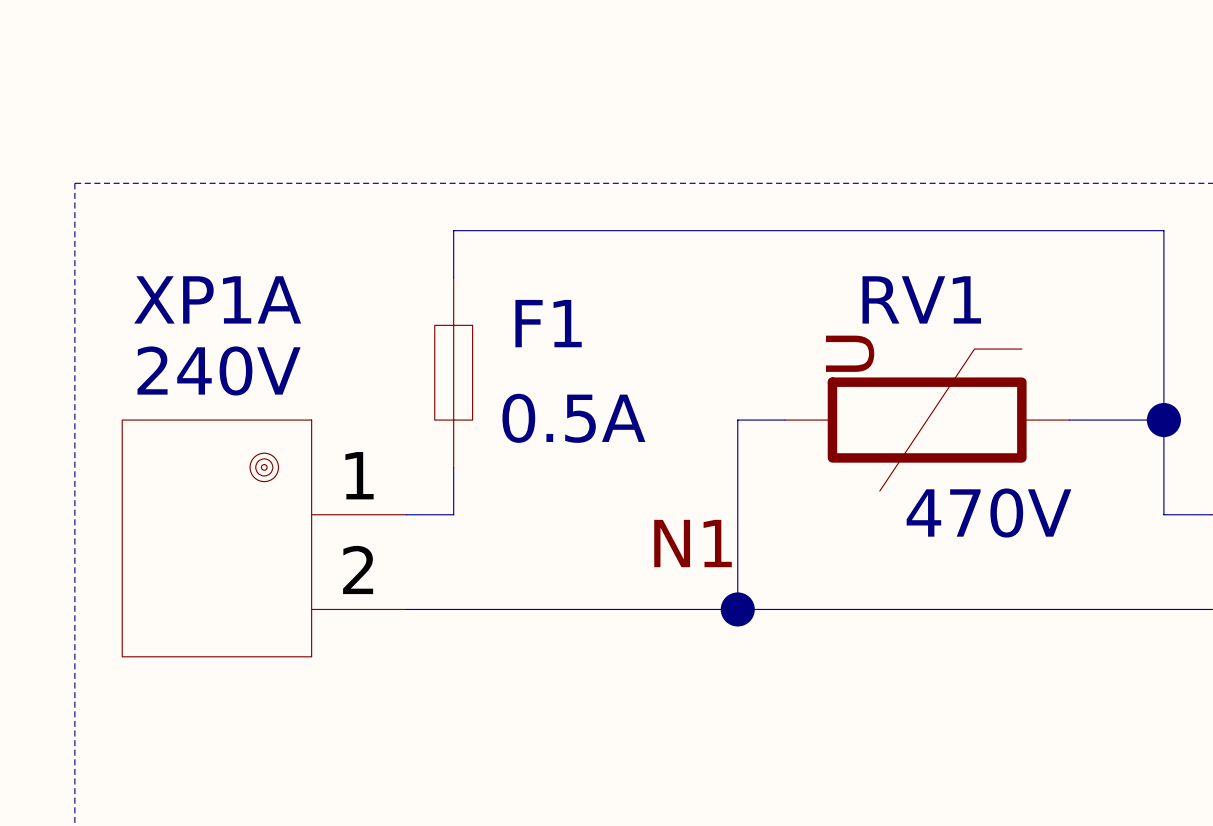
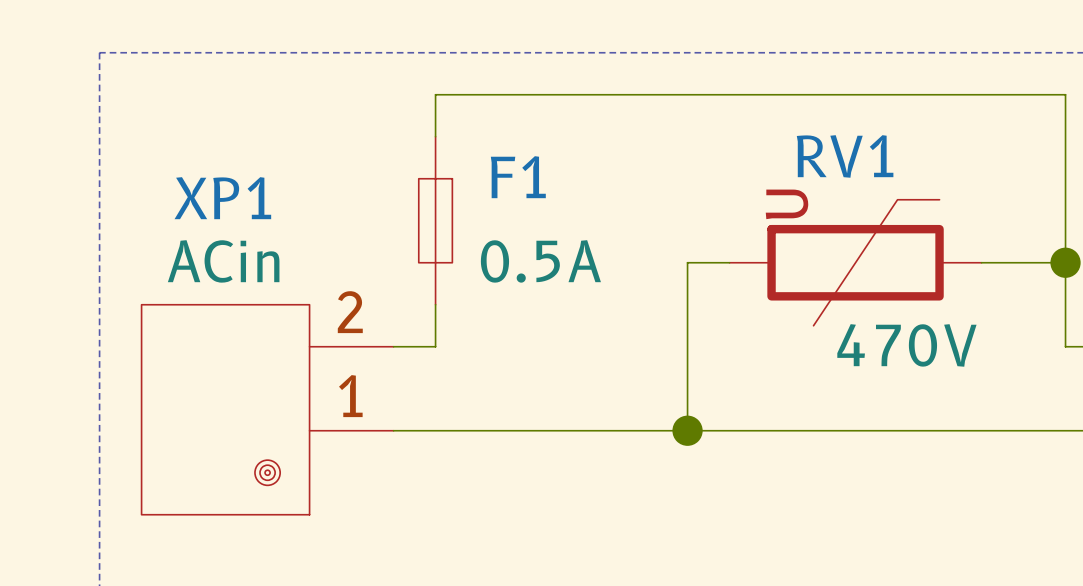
XP1A: 240V (264, 538) -> none
label: N1 (693, 543) -> none
XP1: none -> ACin (267, 409)

